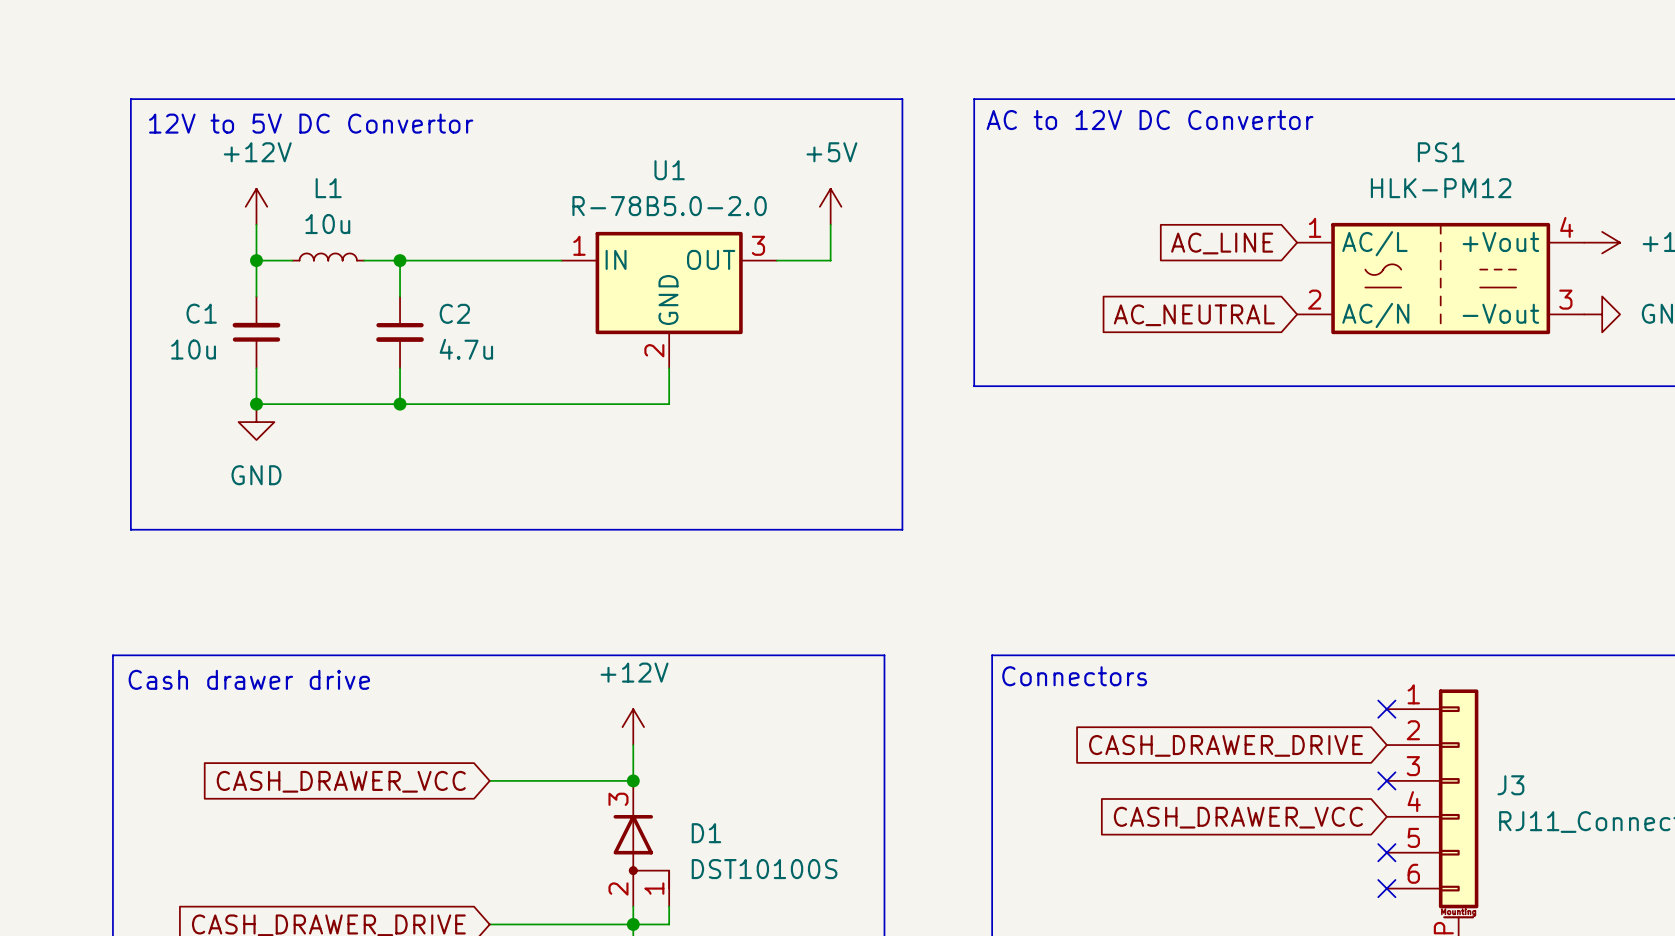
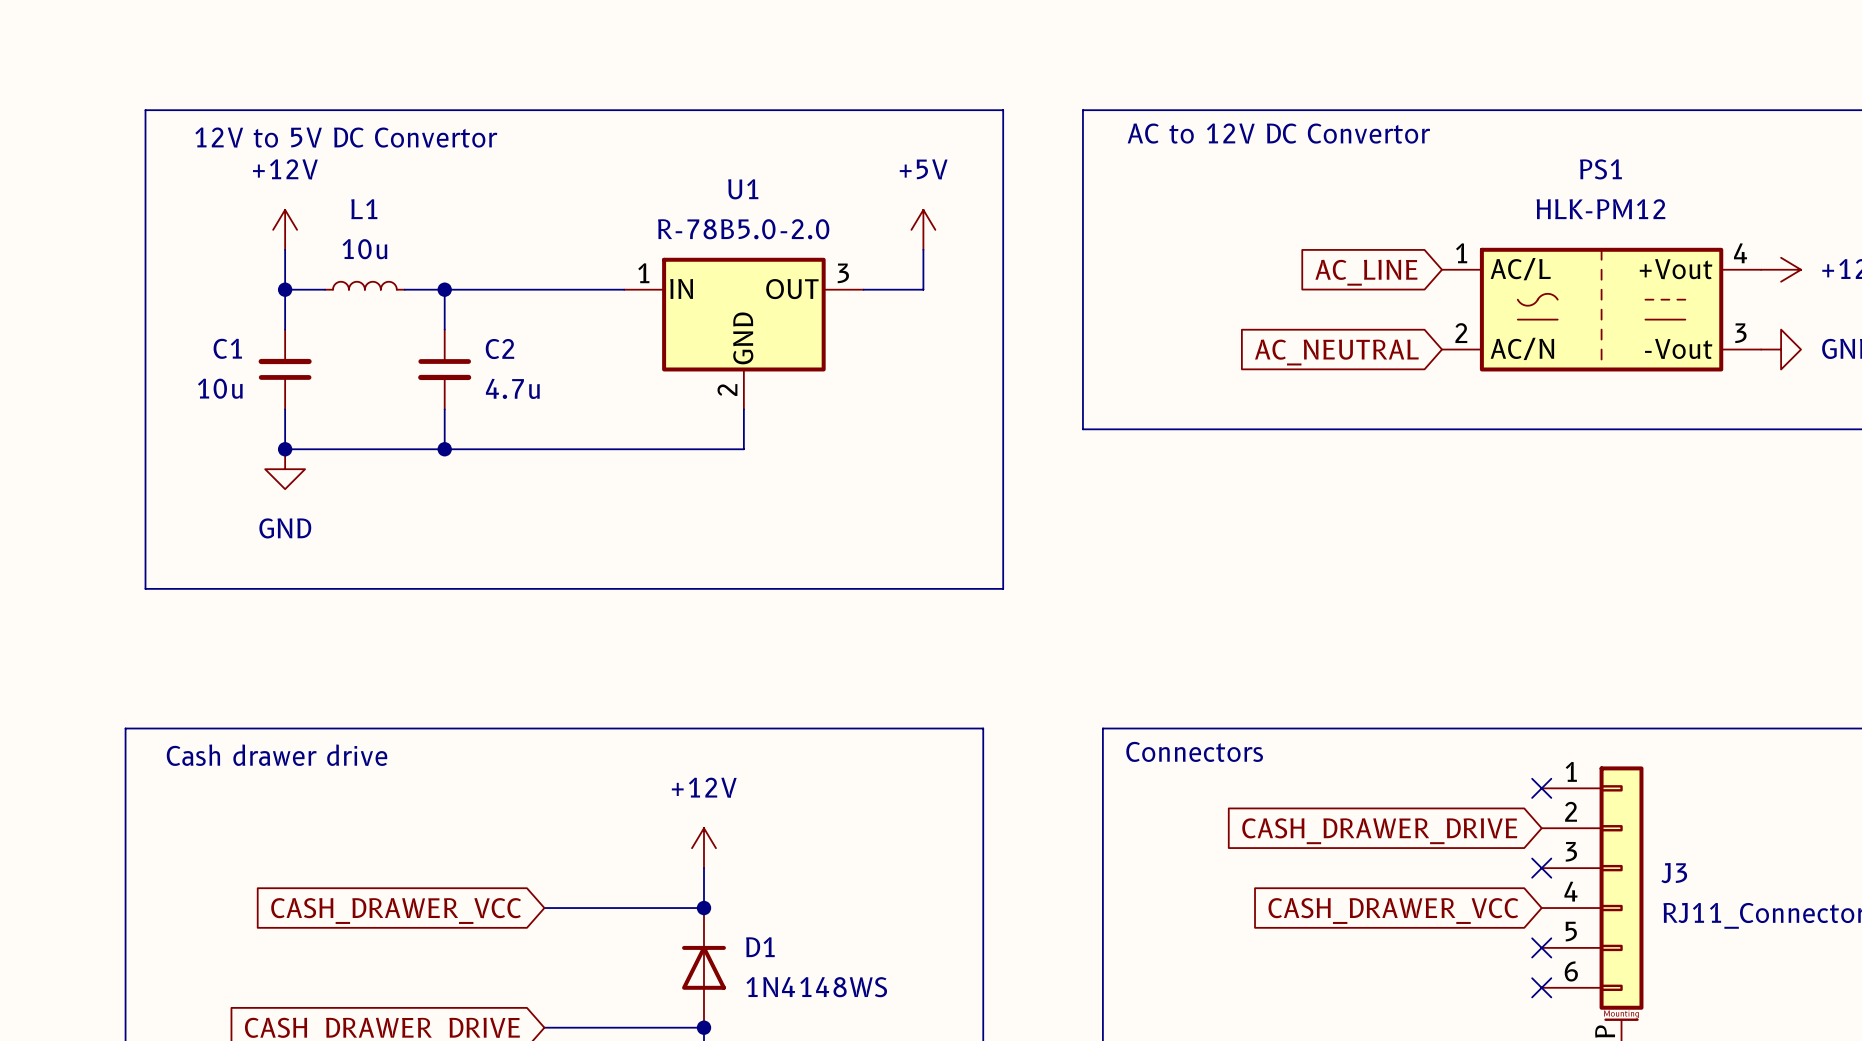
power symbol position: +12V (633, 727) -> +12V (703, 848)
wire: (633, 745) (633, 780) (489, 780) -> (703, 868) (703, 908) (544, 908)
D1 symbol: [613, 780, 670, 907] -> [682, 908, 726, 1028]
junction position: (633, 780) -> (703, 908)
global label position: CASH_DRAWER_VCC (341, 781) -> CASH_DRAWER_VCC (396, 911)
D1 value: DST10100S (764, 869) -> 1N4148WS (816, 987)
wire: (633, 906) (633, 924) (669, 924) (669, 906) -> none

